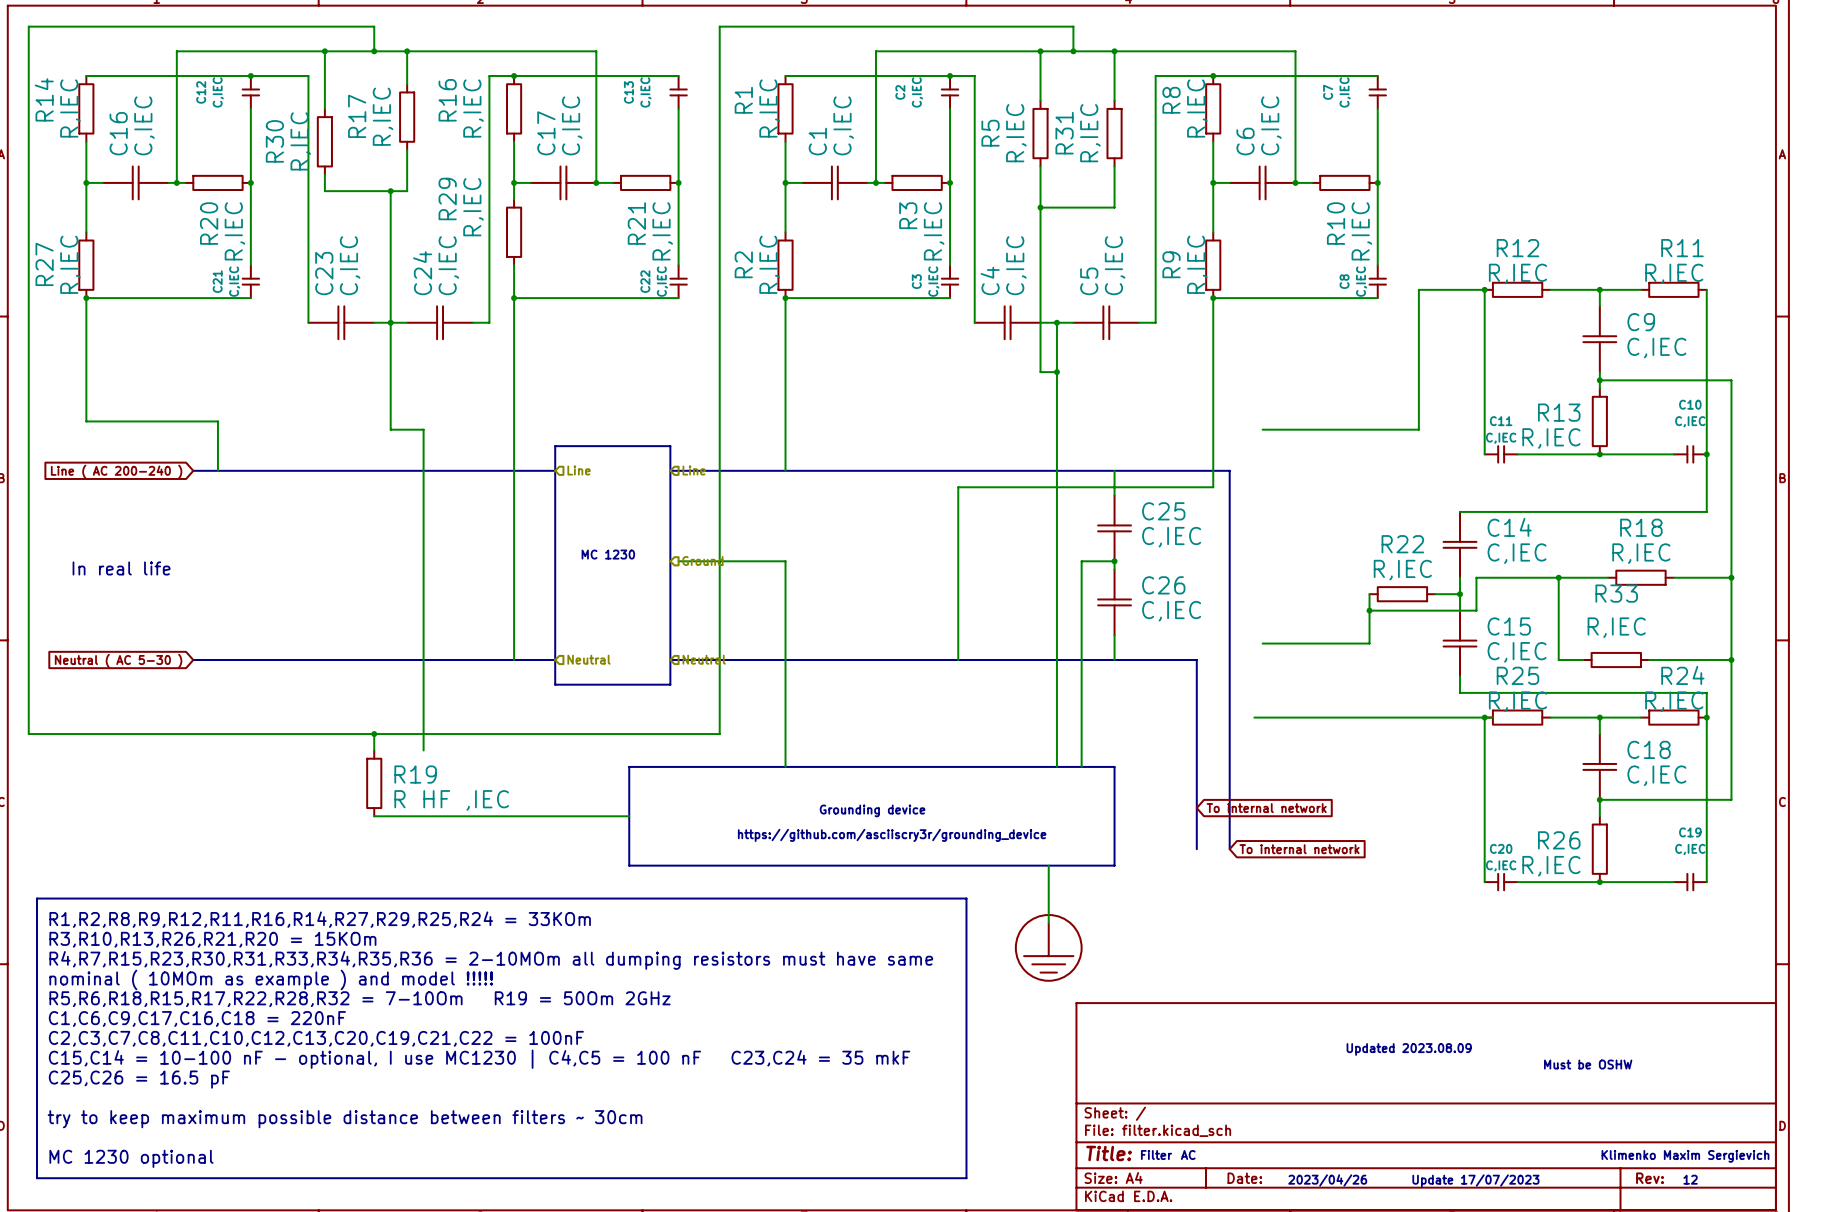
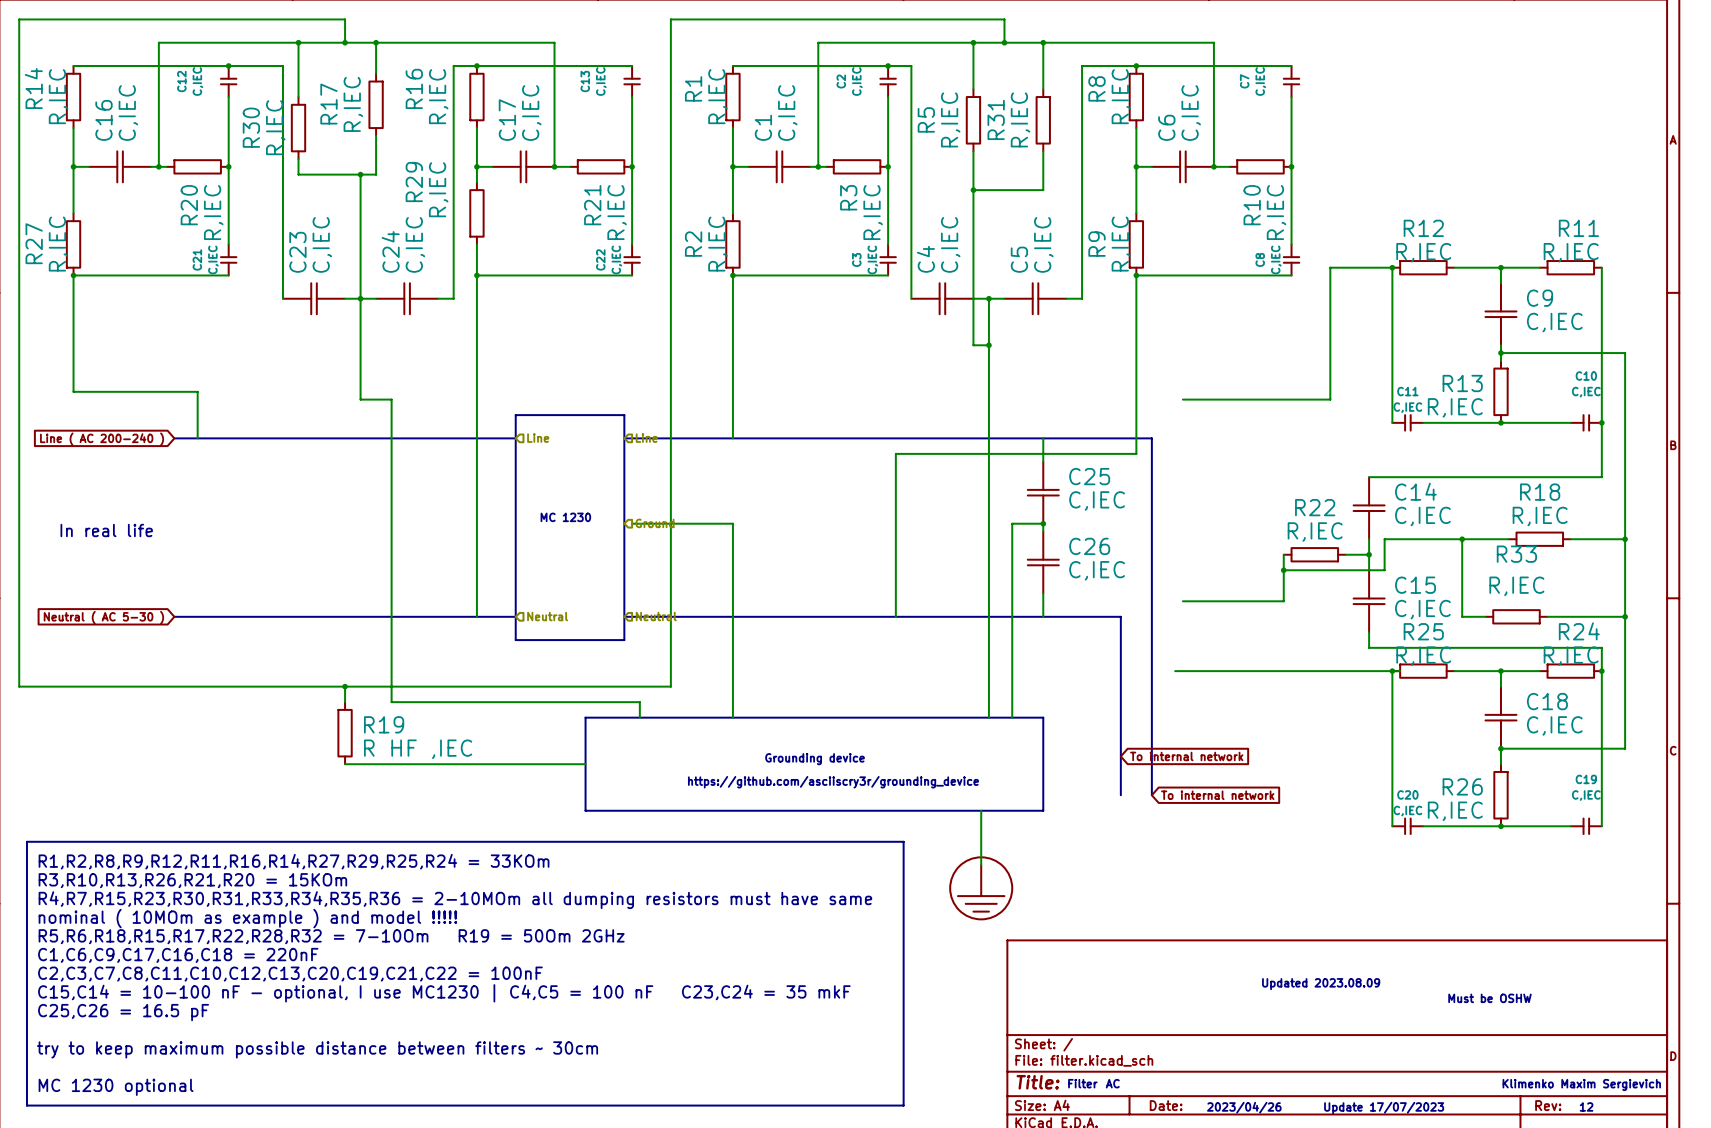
wire: none -> (391, 702) (639, 702) (639, 717)

